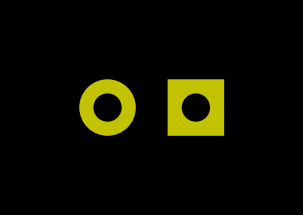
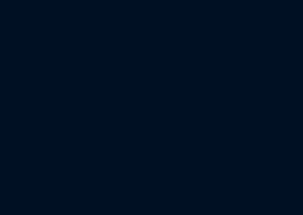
part: (151, 107) -> none

